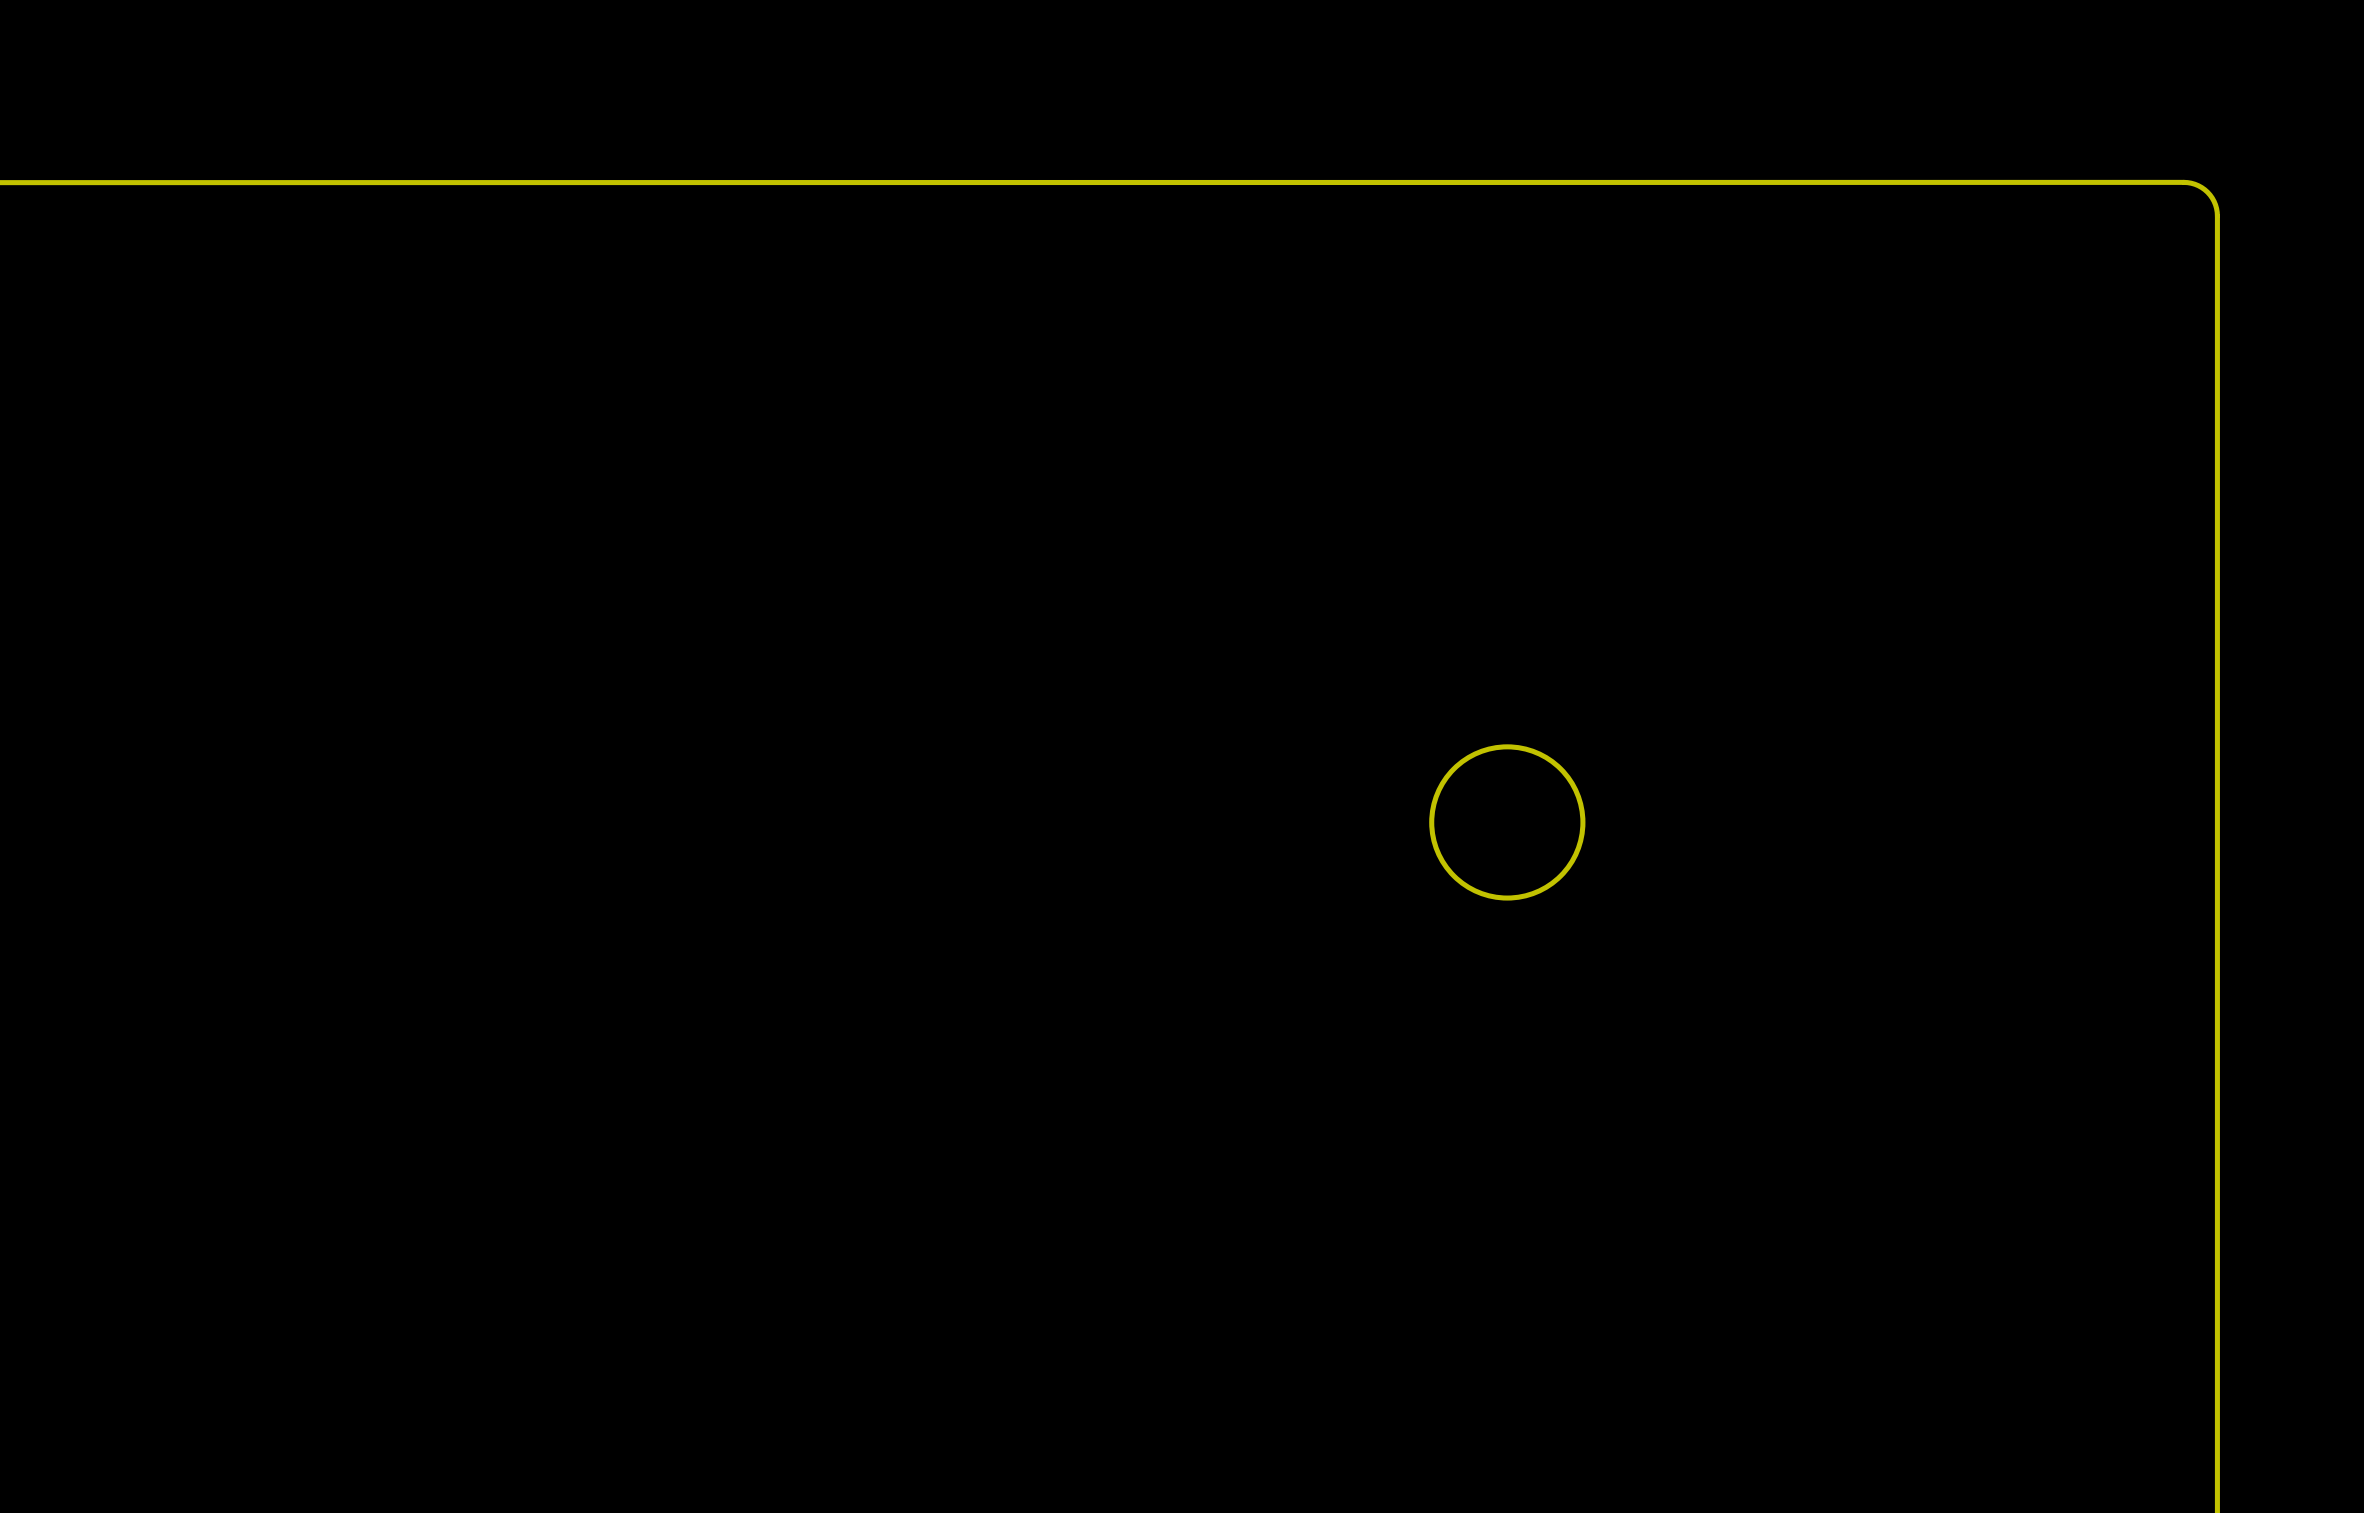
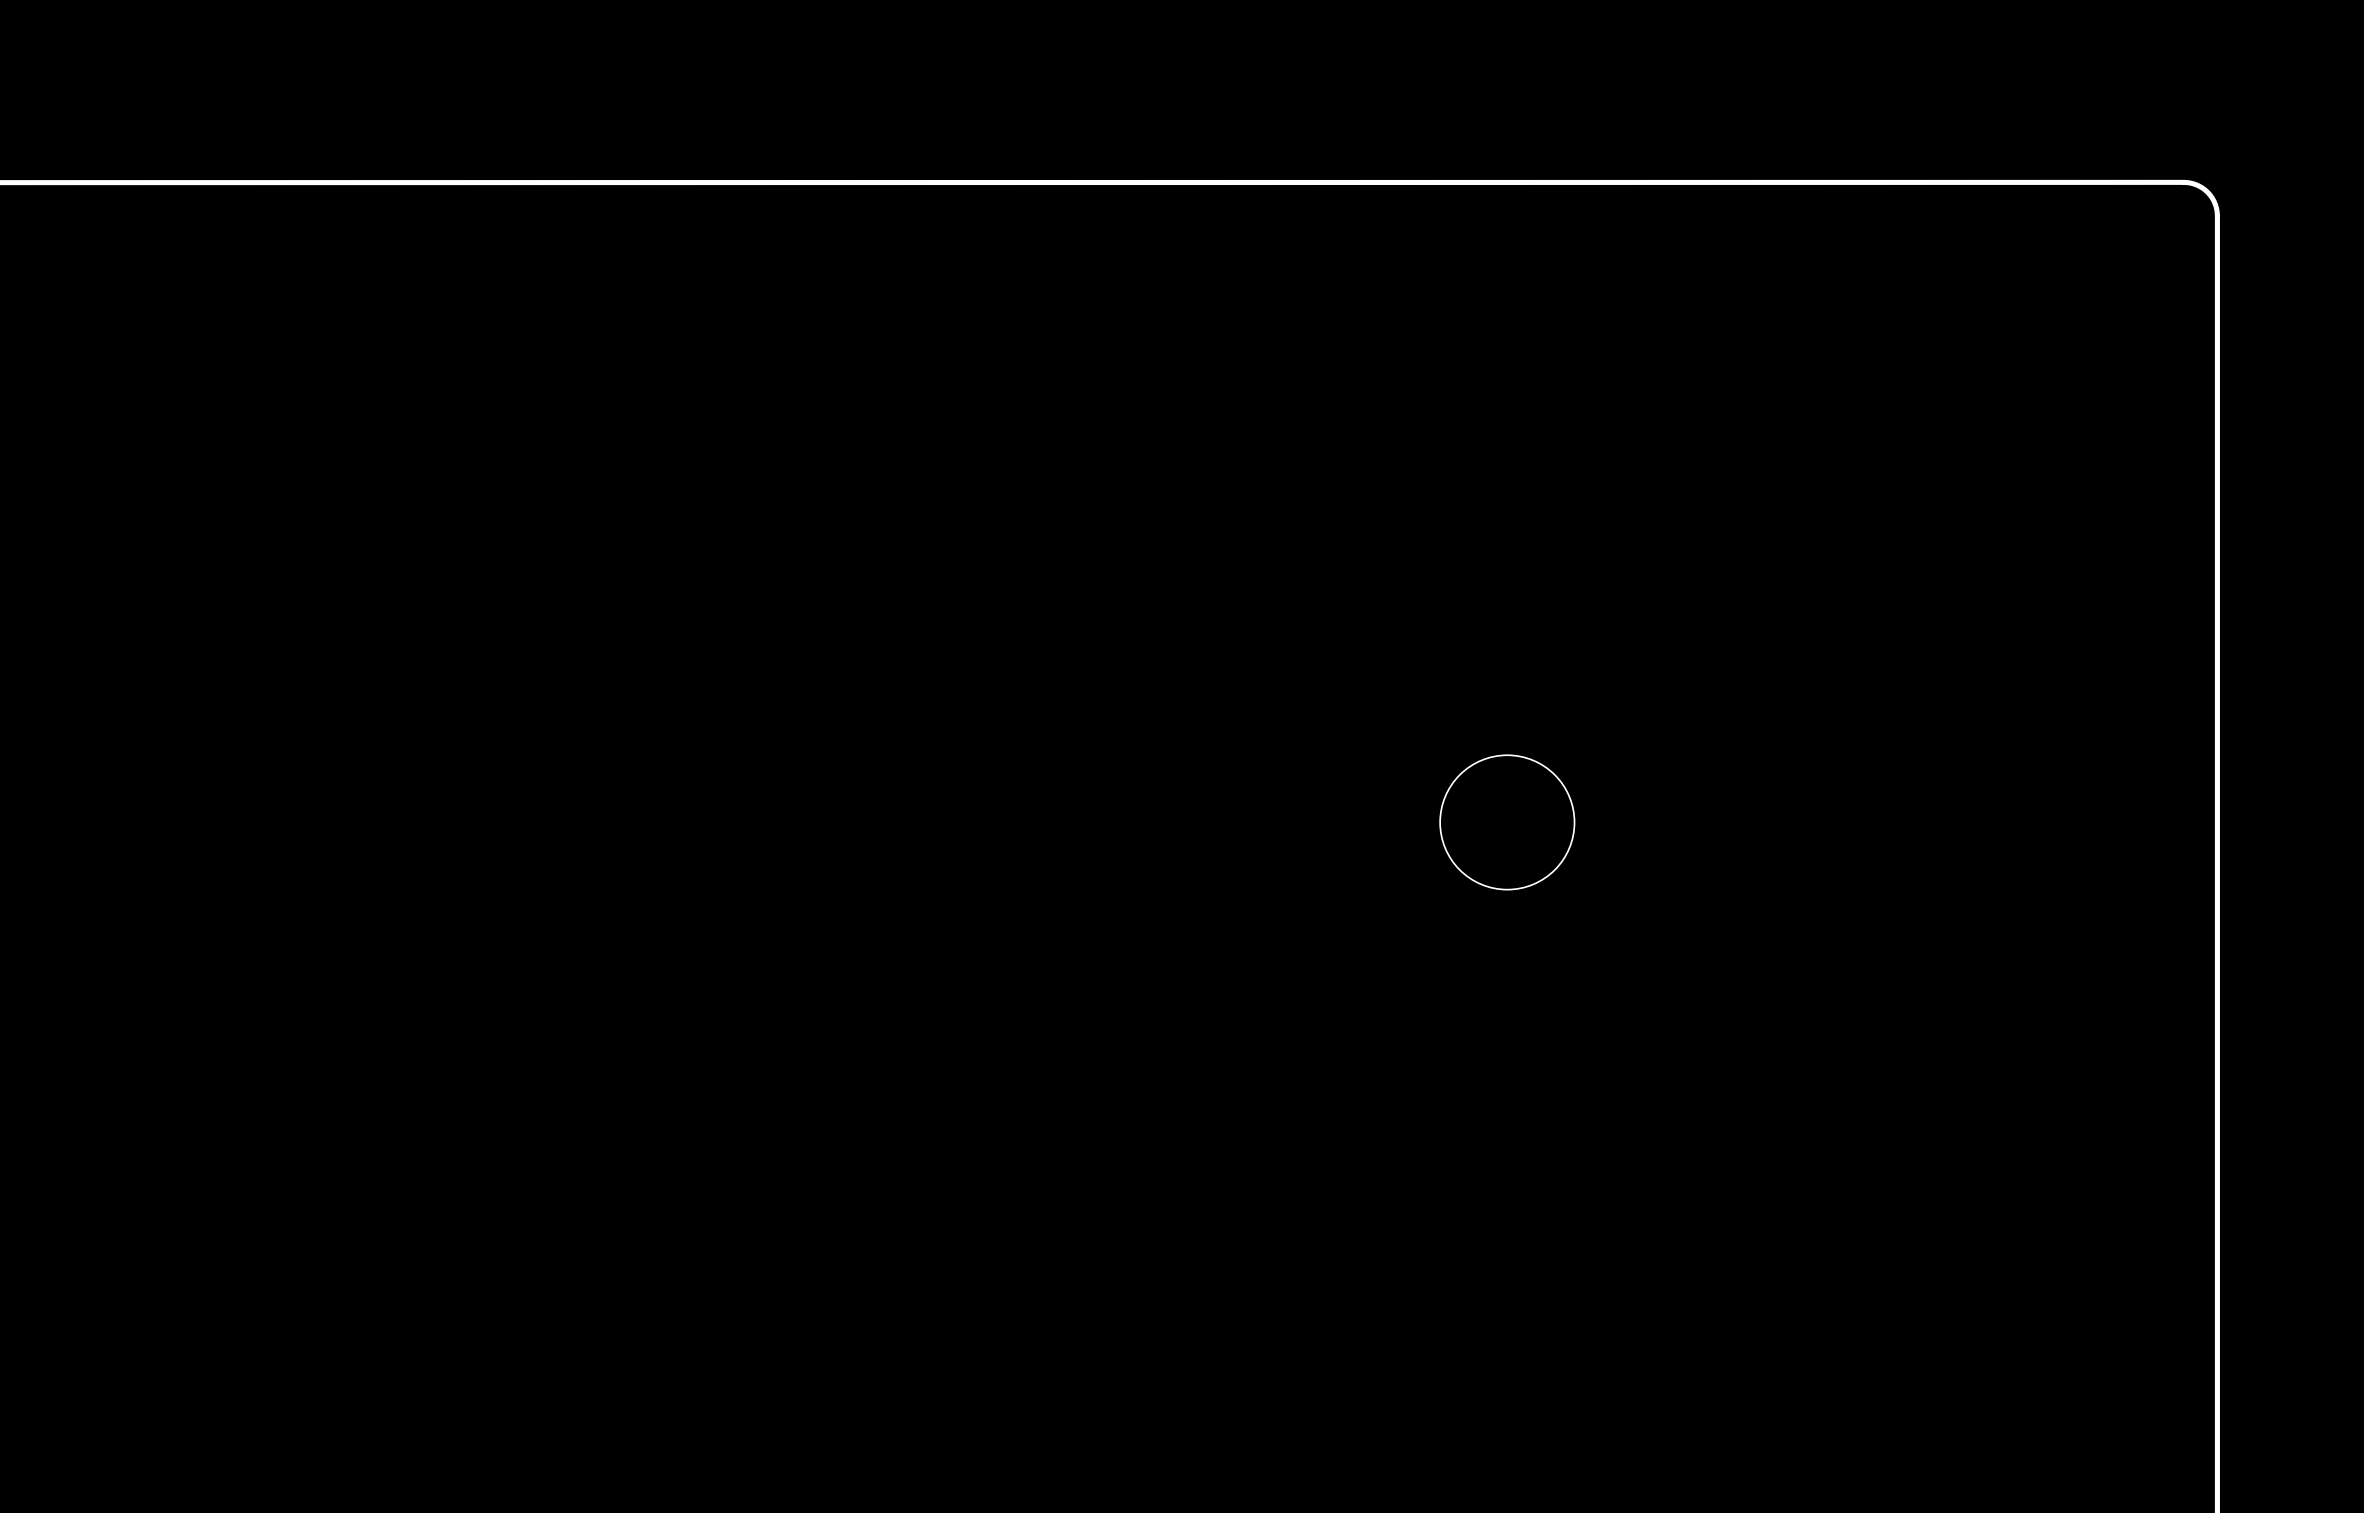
round board edge size: [1429, 744, 1586, 901] -> [1439, 754, 1576, 891]

